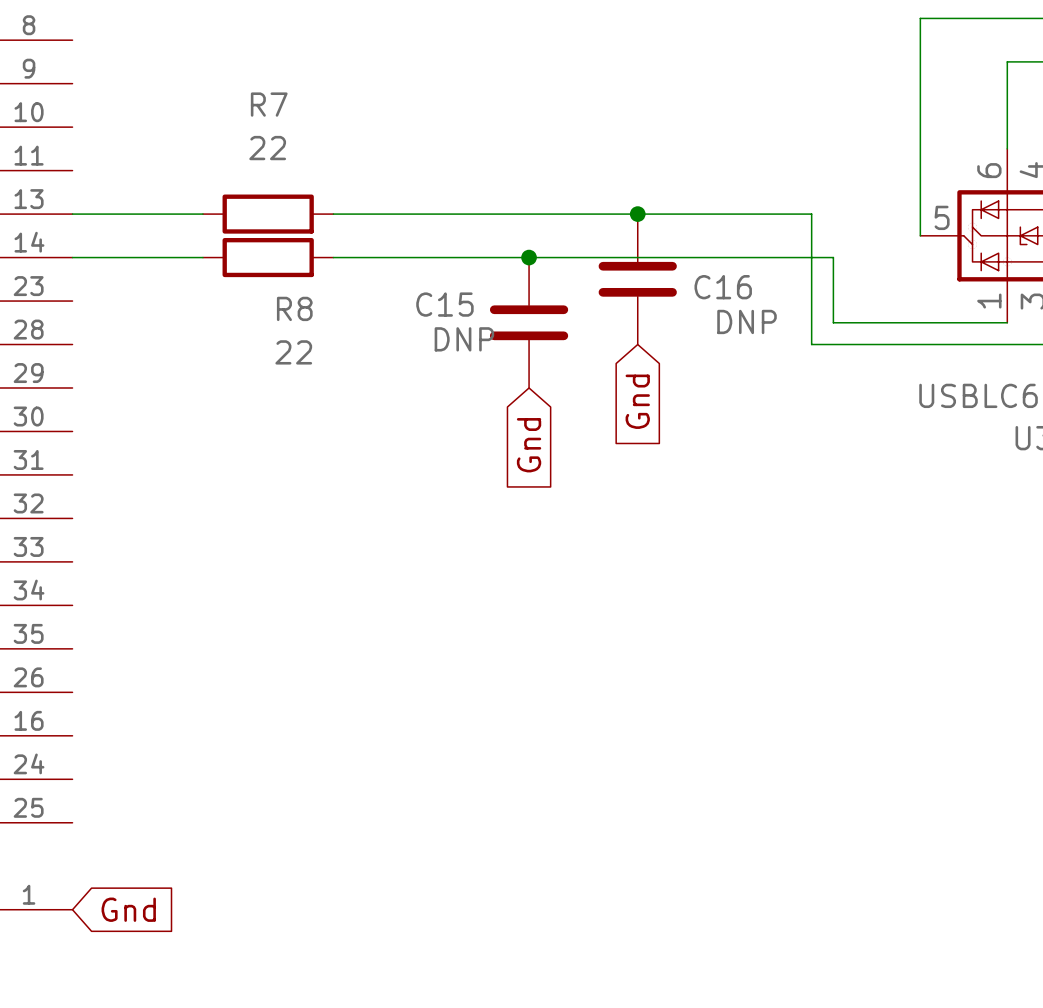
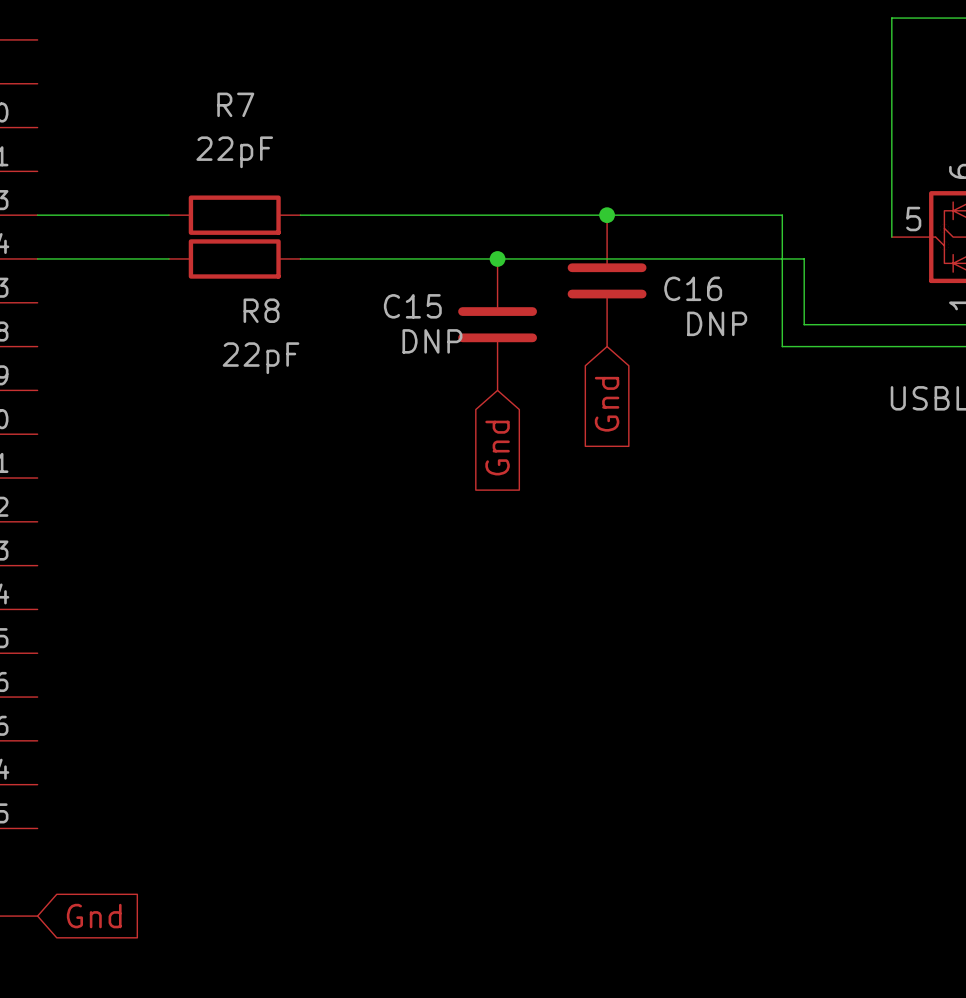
R7 value: 22 (267, 148) -> 22pF (234, 152)
R8 value: 22 (293, 352) -> 22pF (261, 358)

